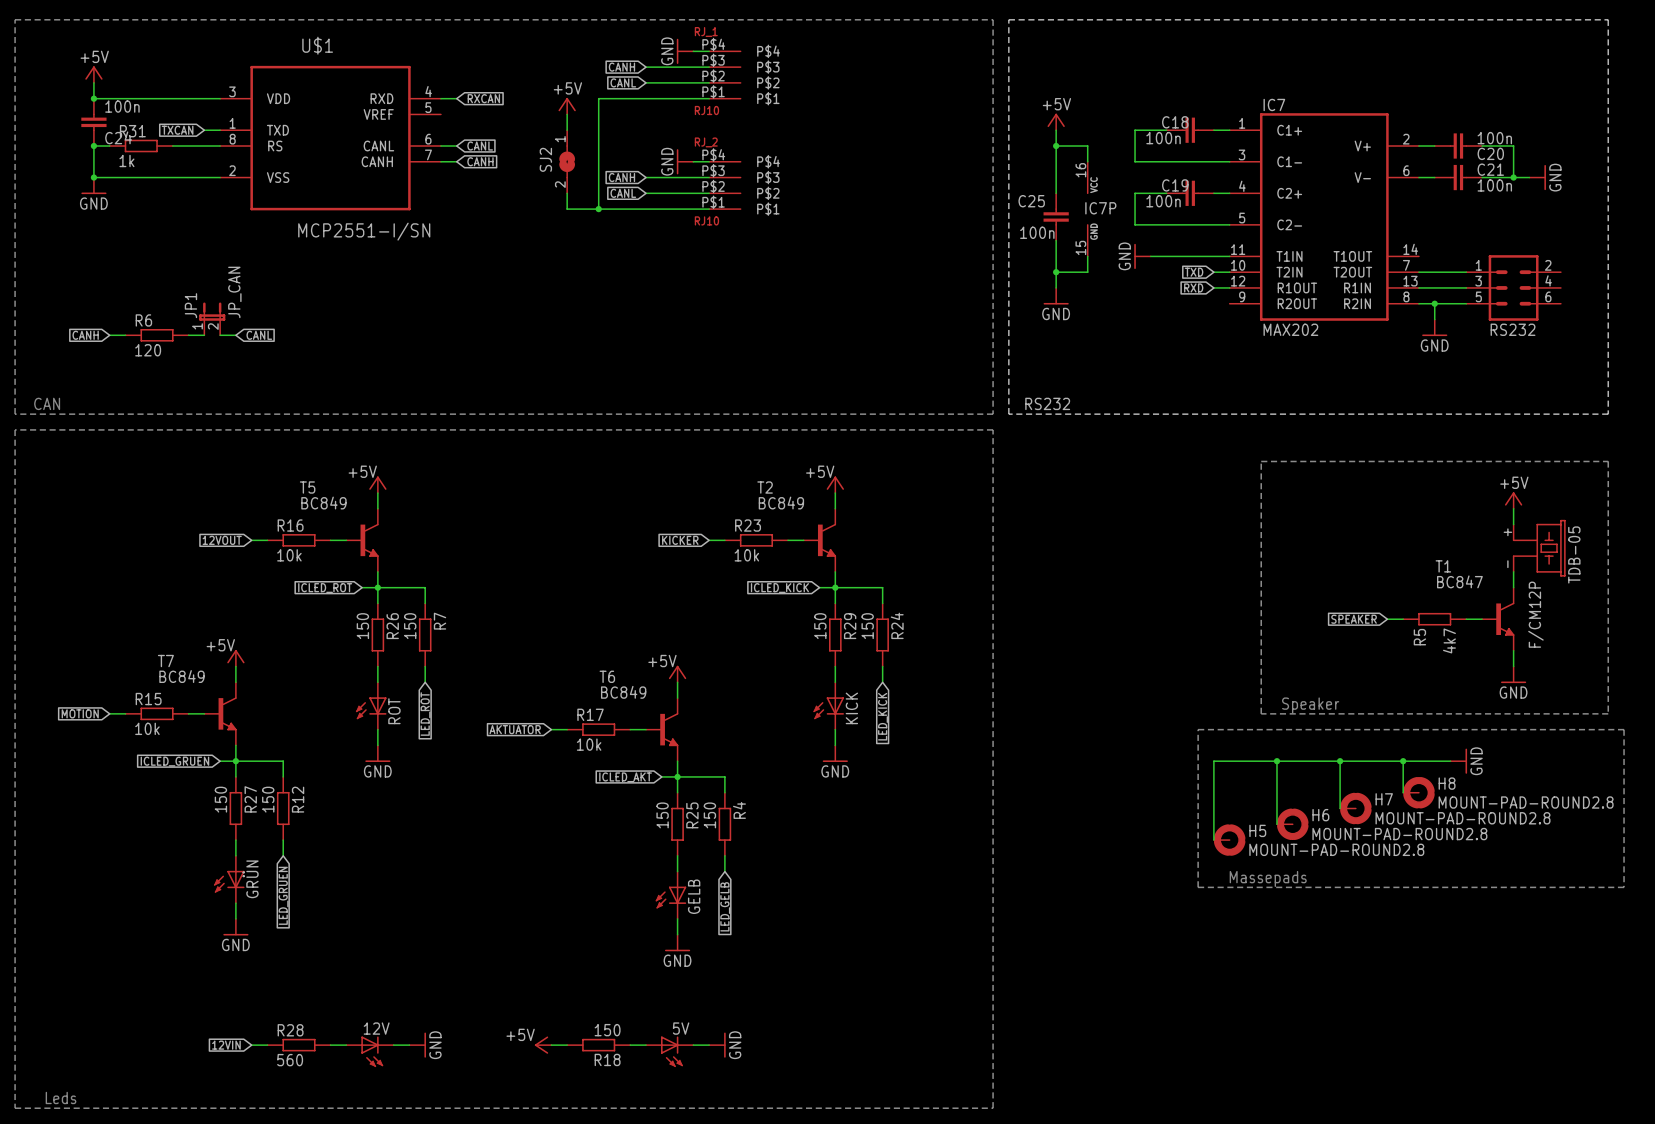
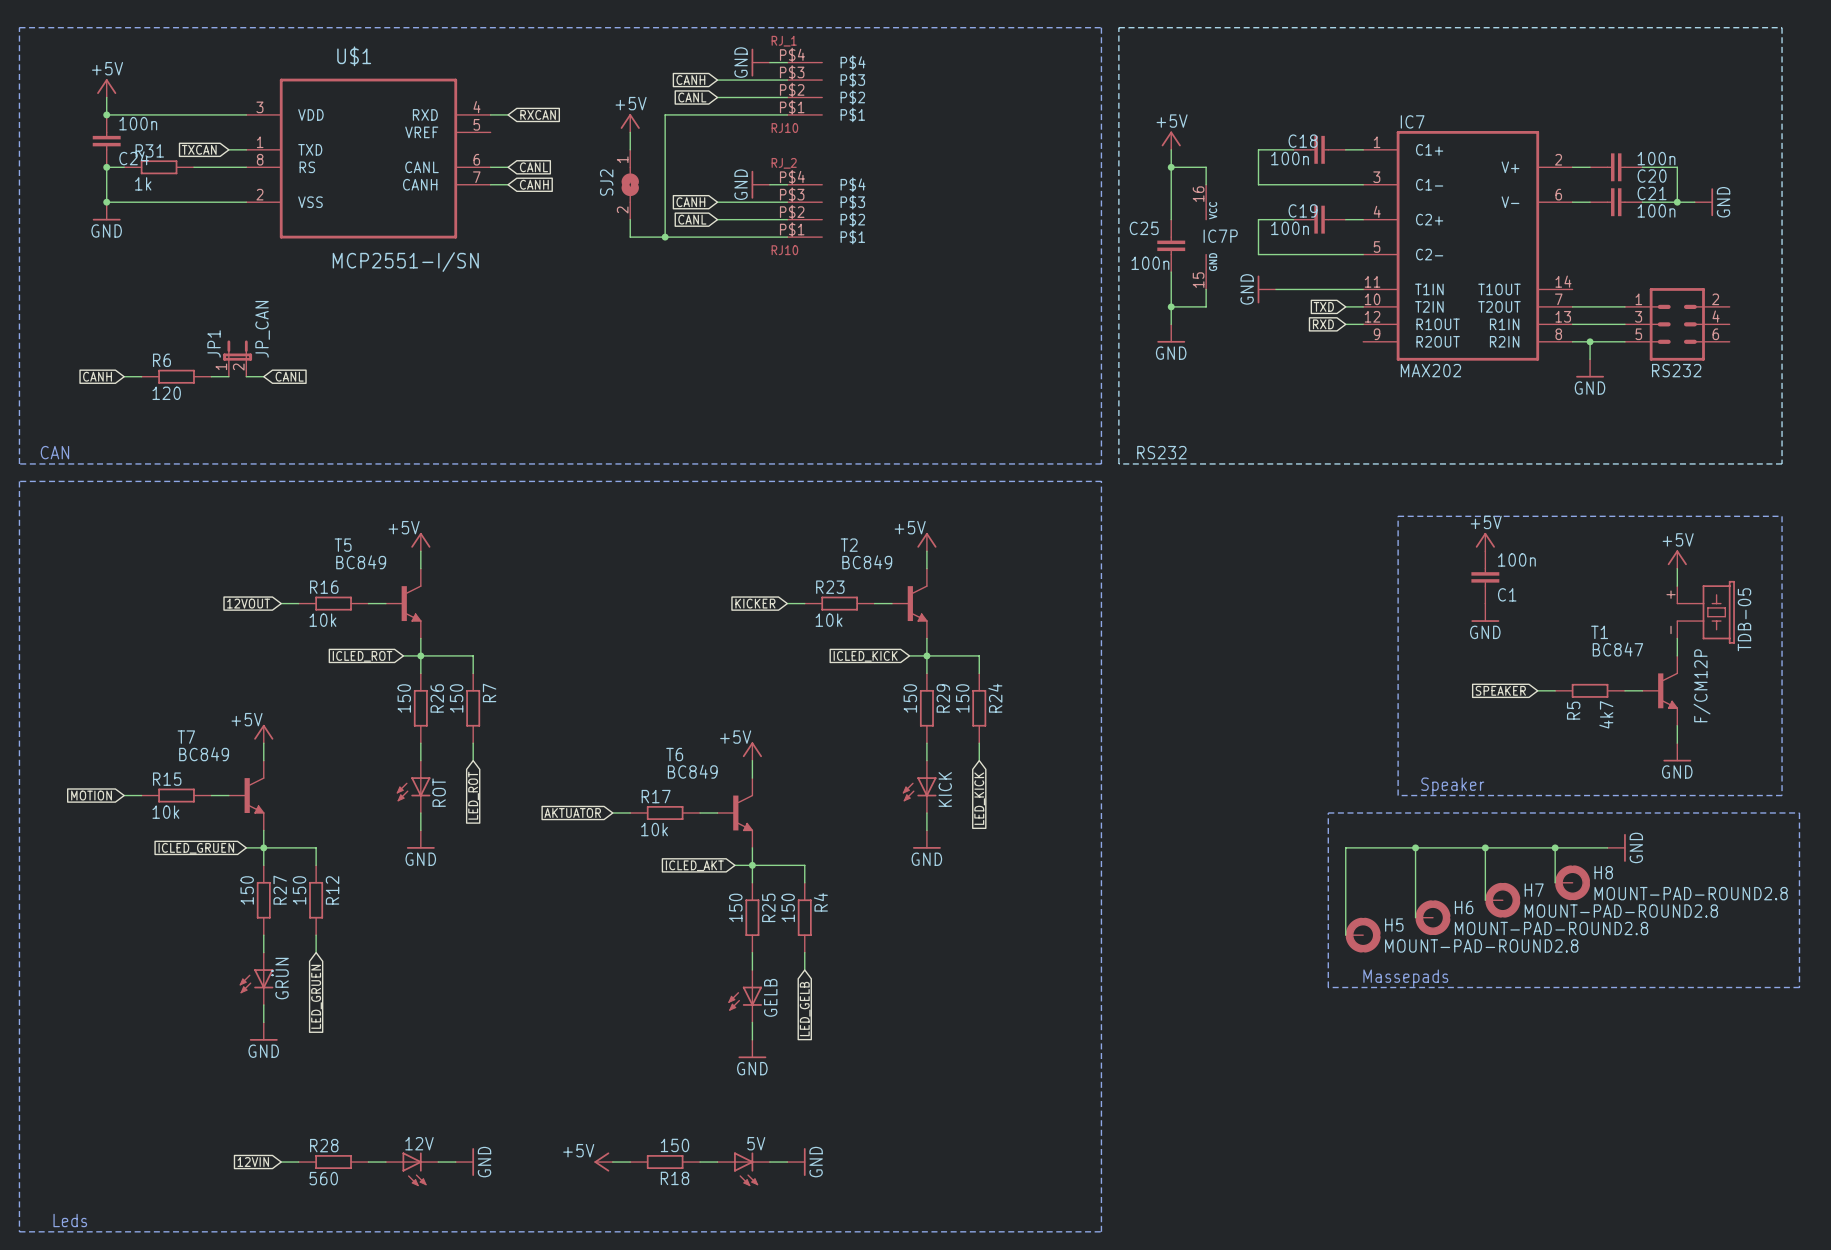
power symbol: none -> +5V (1485, 542)
C1: none -> 100n (1485, 577)
power symbol: none -> GND (1485, 612)

